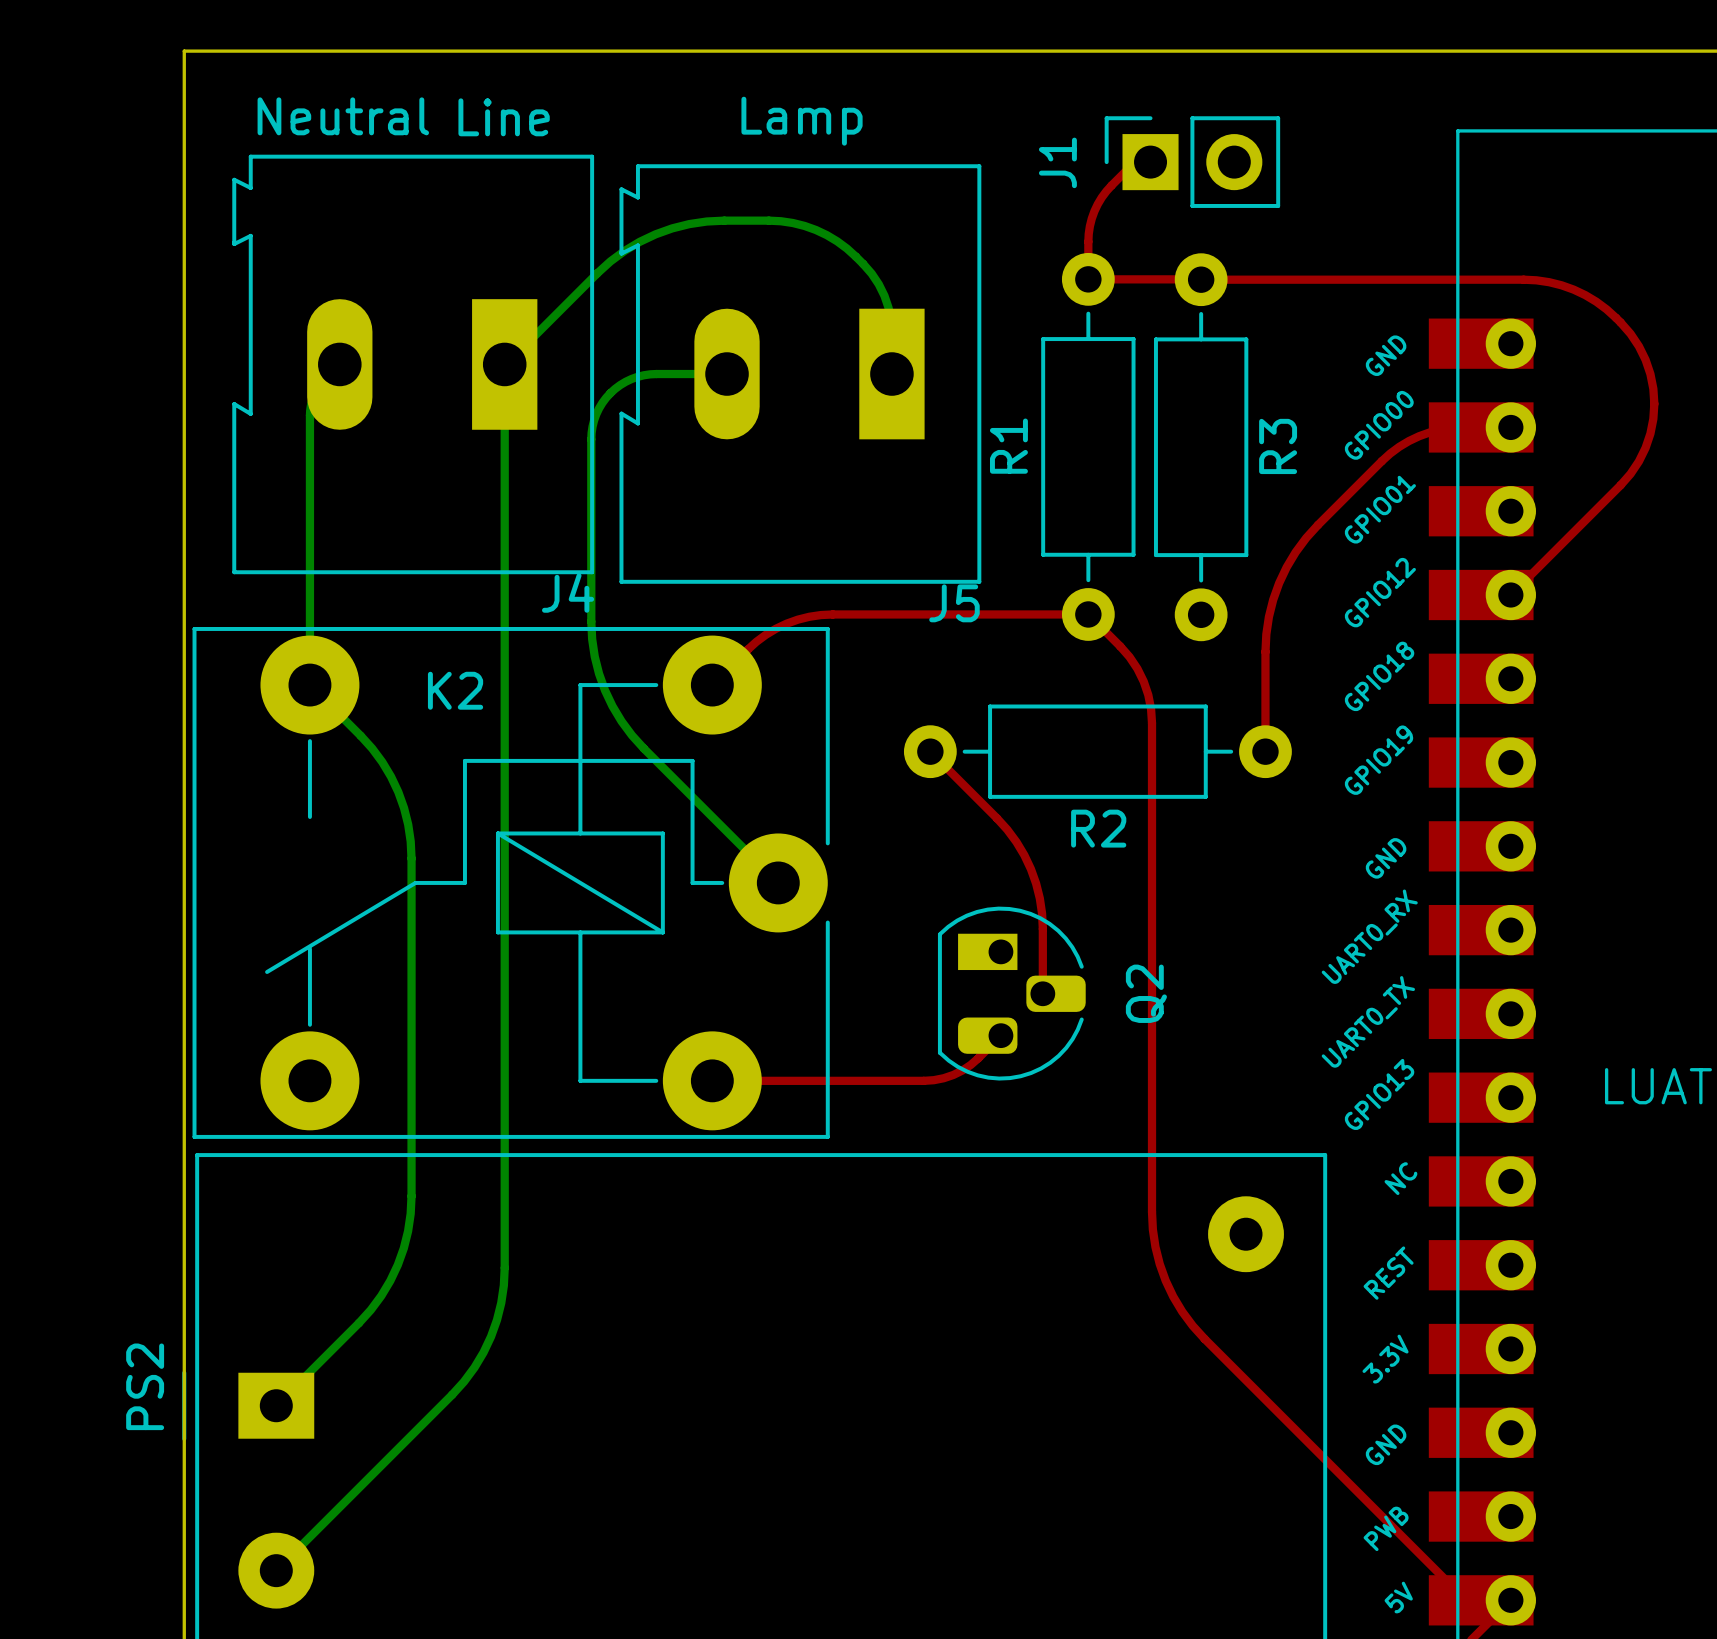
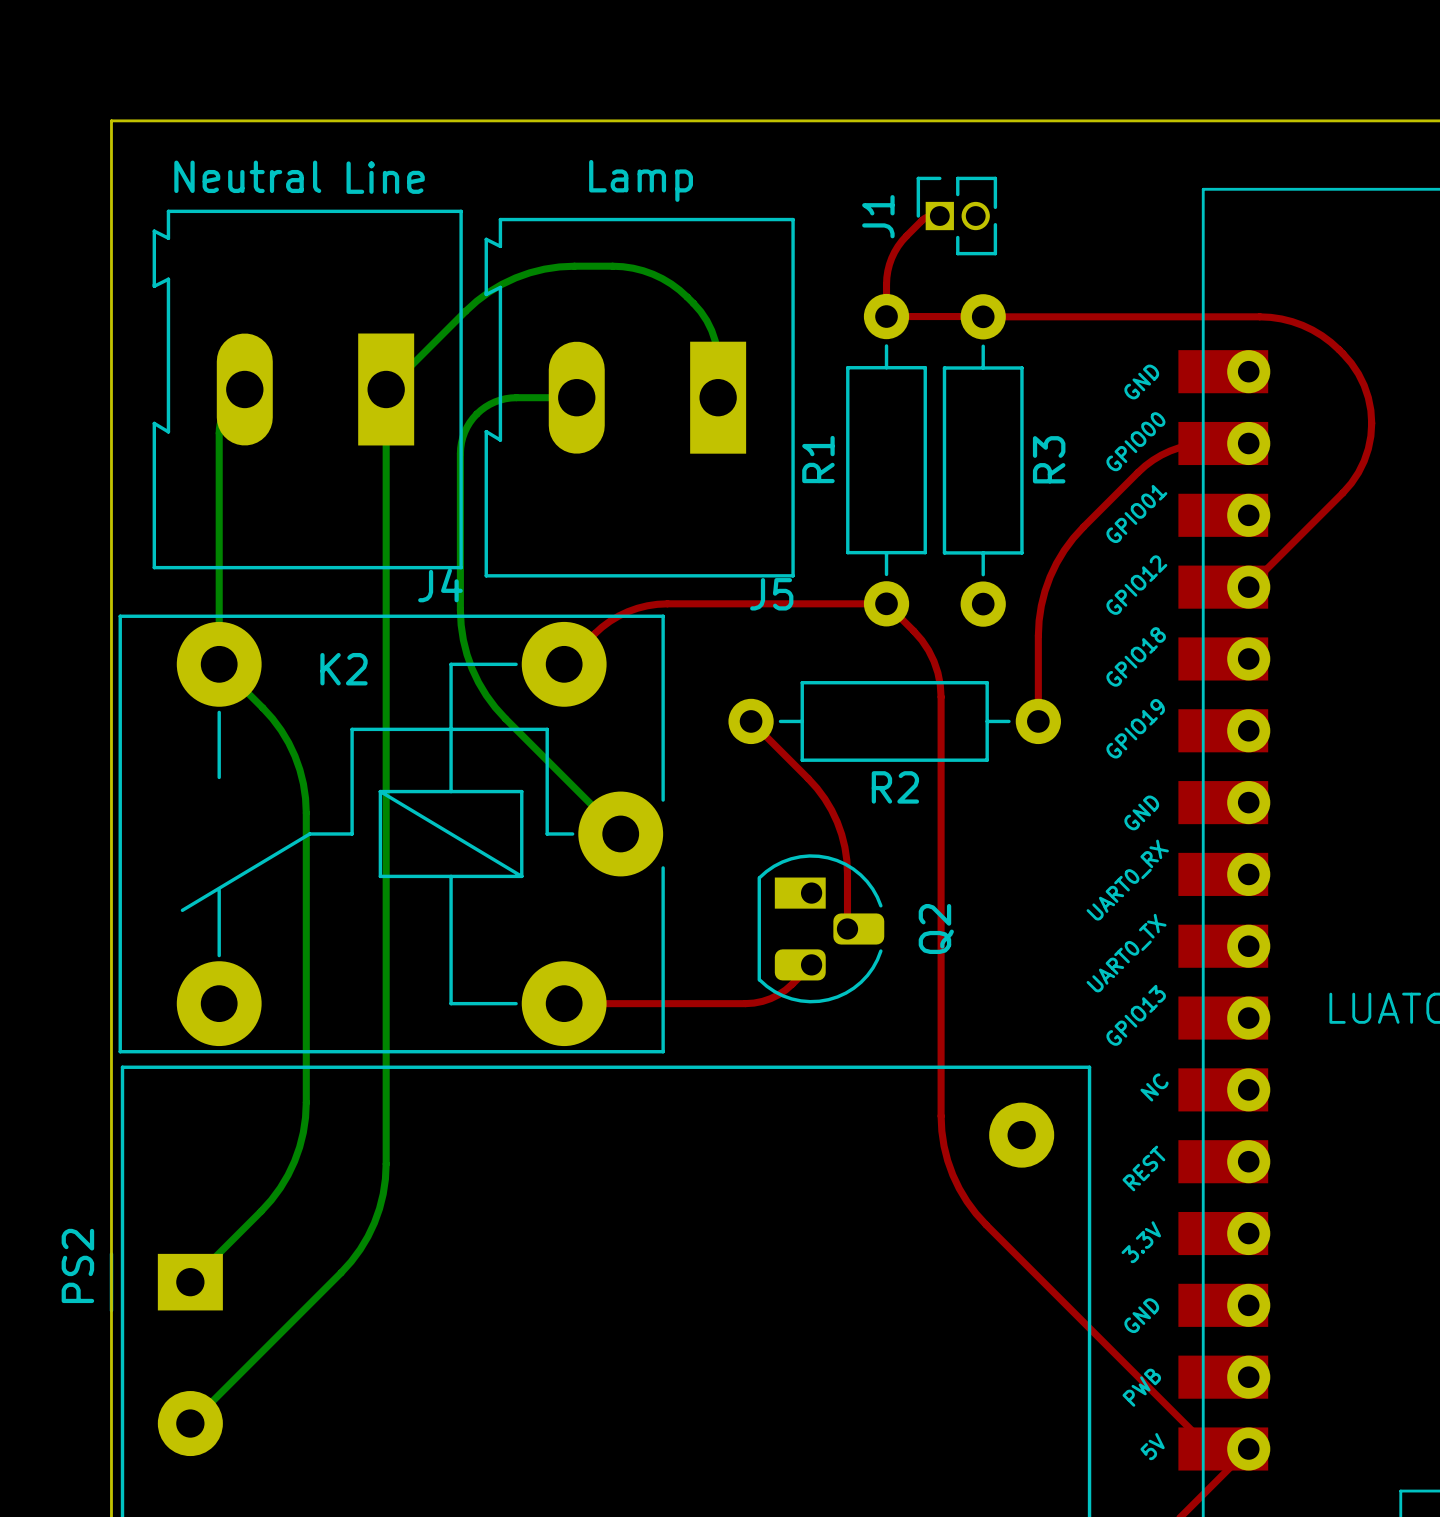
J1 footprint: [1104, 116, 1281, 208] -> [916, 176, 998, 256]

